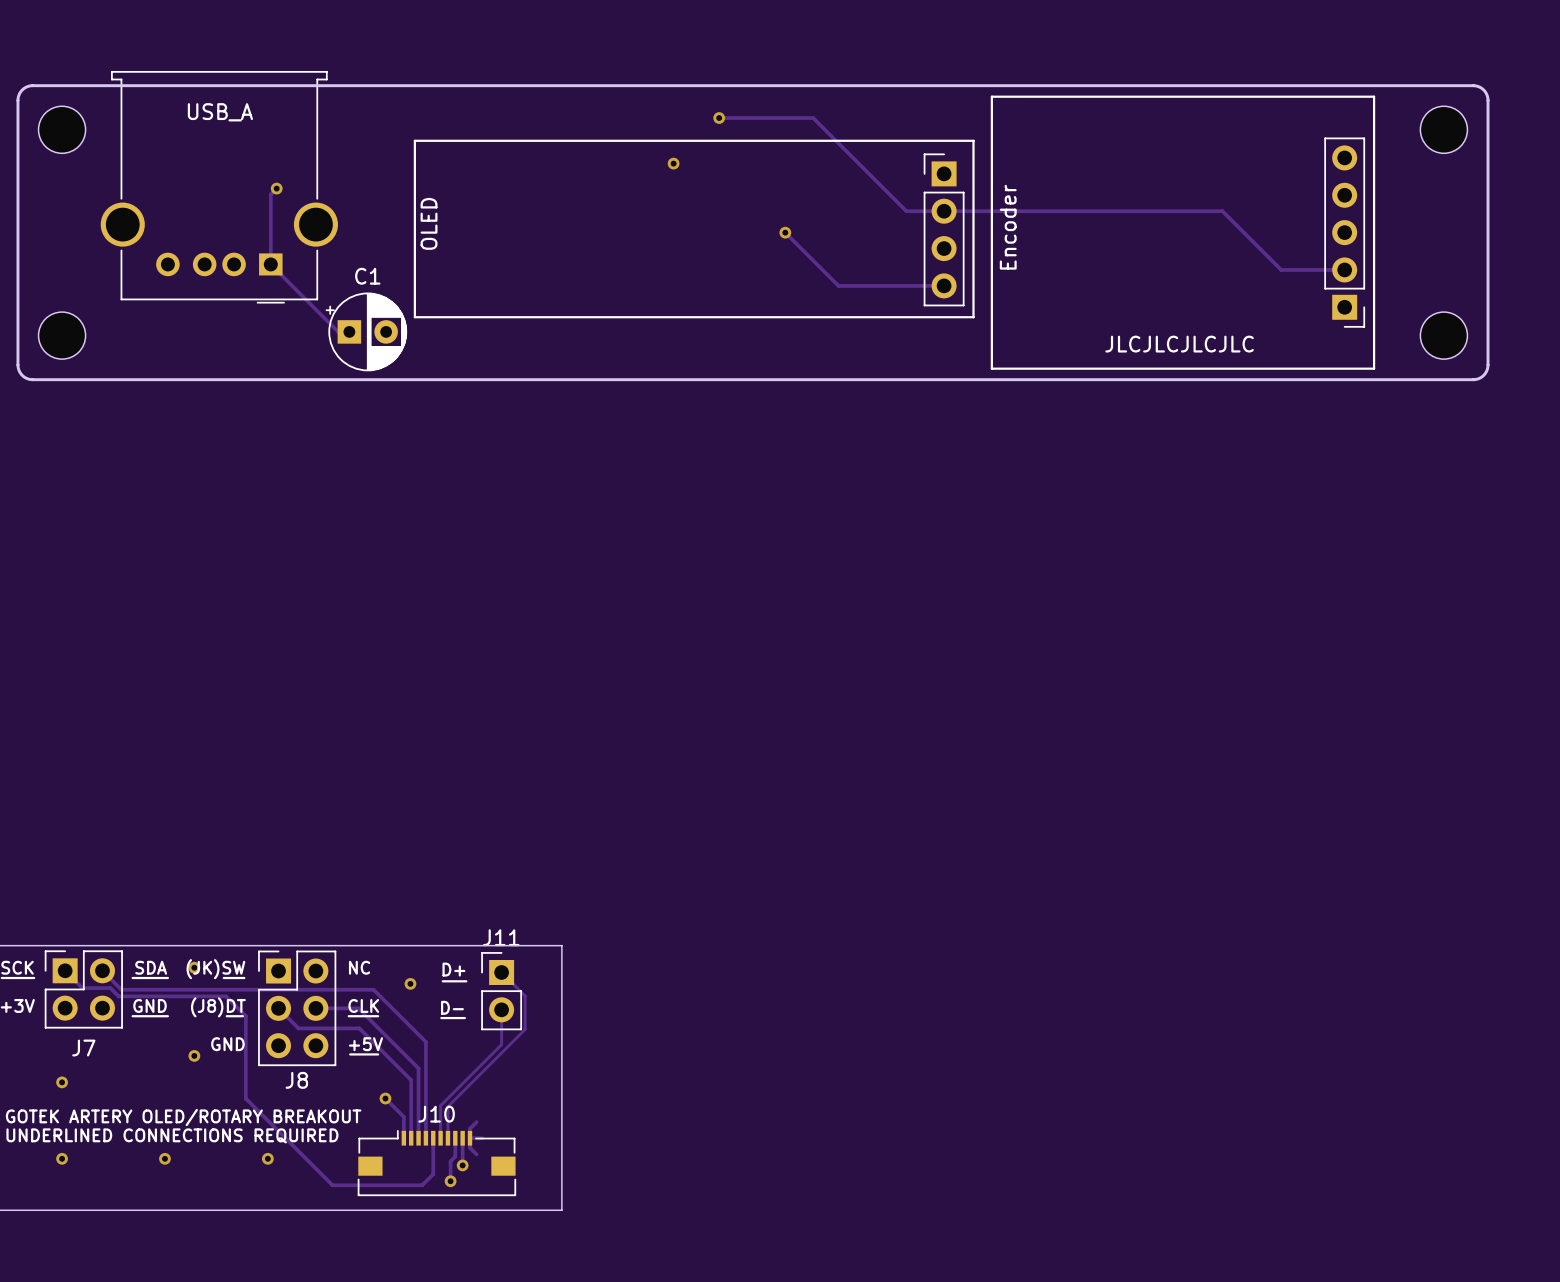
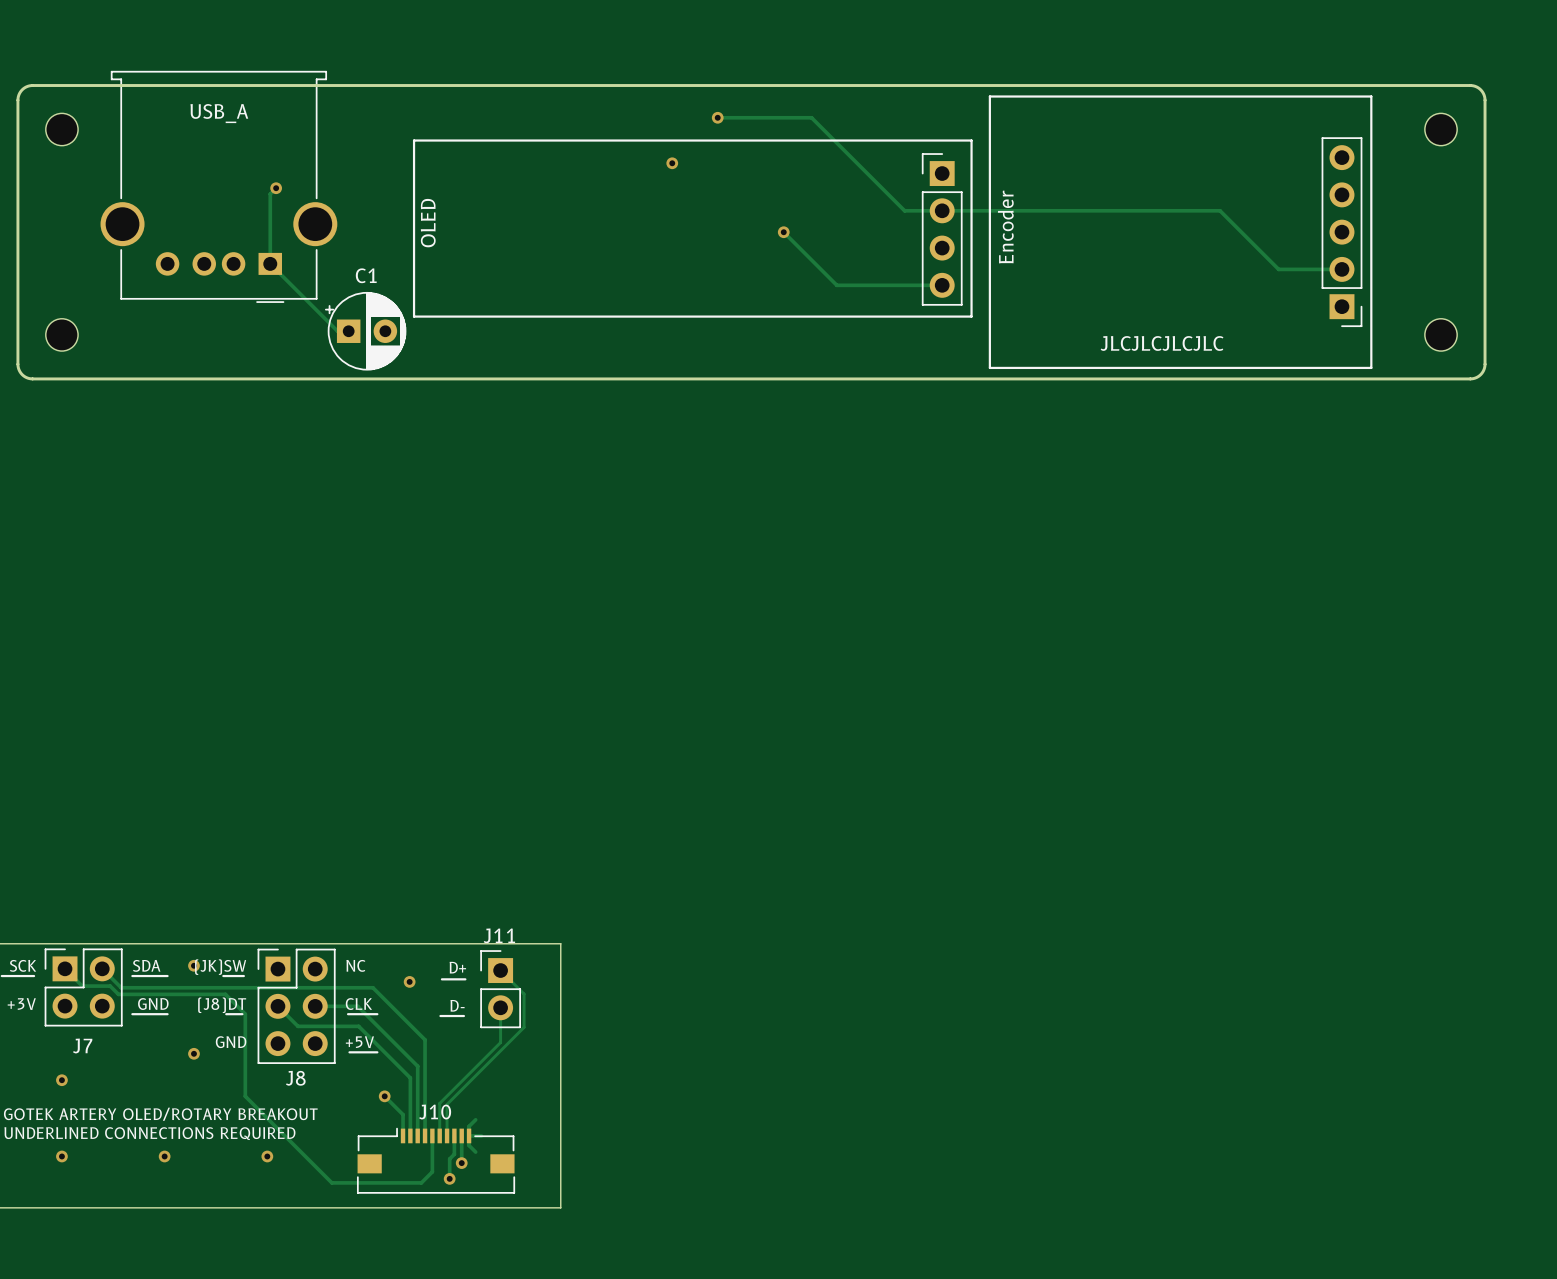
part footprint: [38, 106, 86, 154] -> [45, 113, 79, 146]
part footprint: [1420, 106, 1468, 154] -> [1424, 113, 1458, 146]
part footprint: [38, 312, 86, 360] -> [45, 318, 79, 352]
part footprint: [1420, 312, 1468, 360] -> [1424, 318, 1458, 352]

